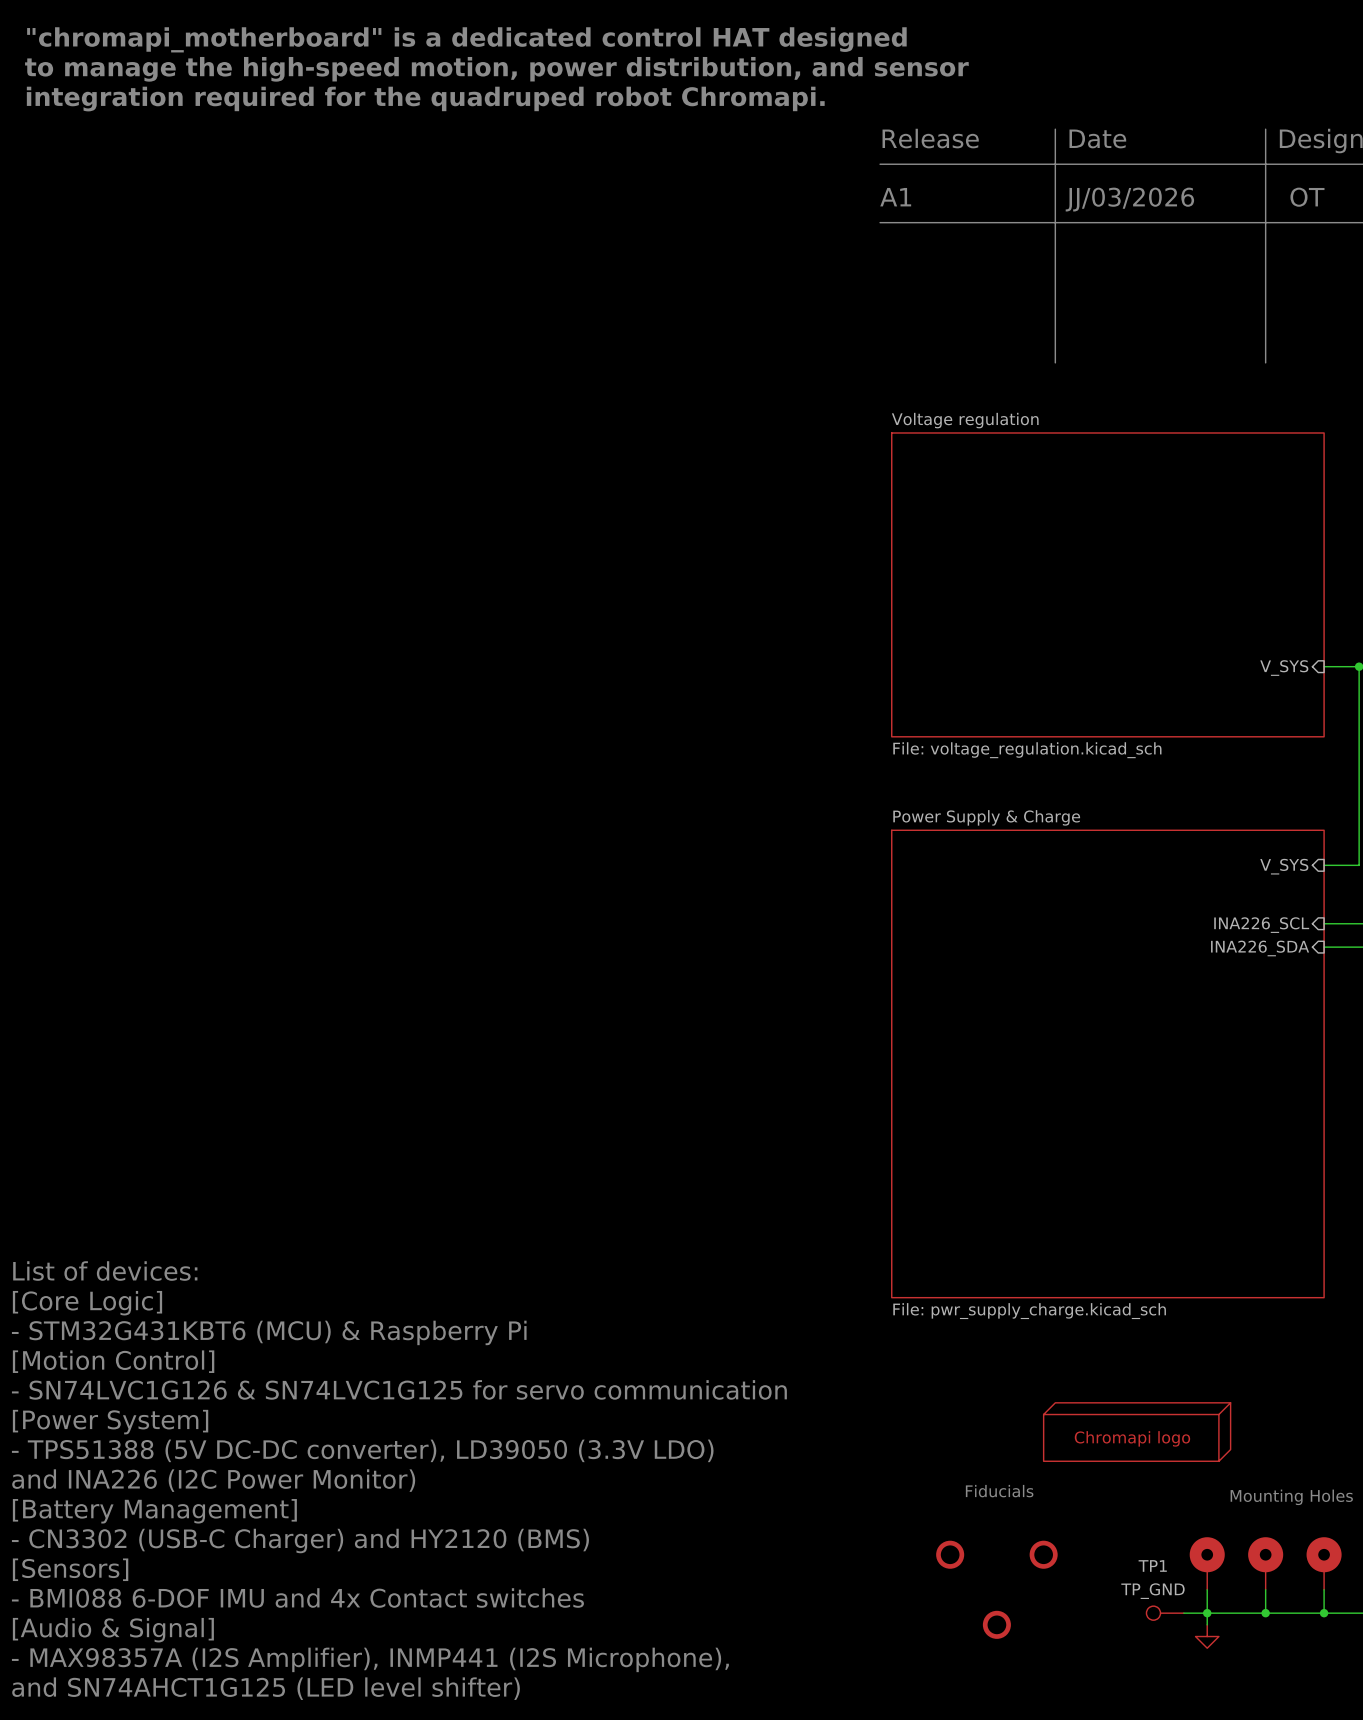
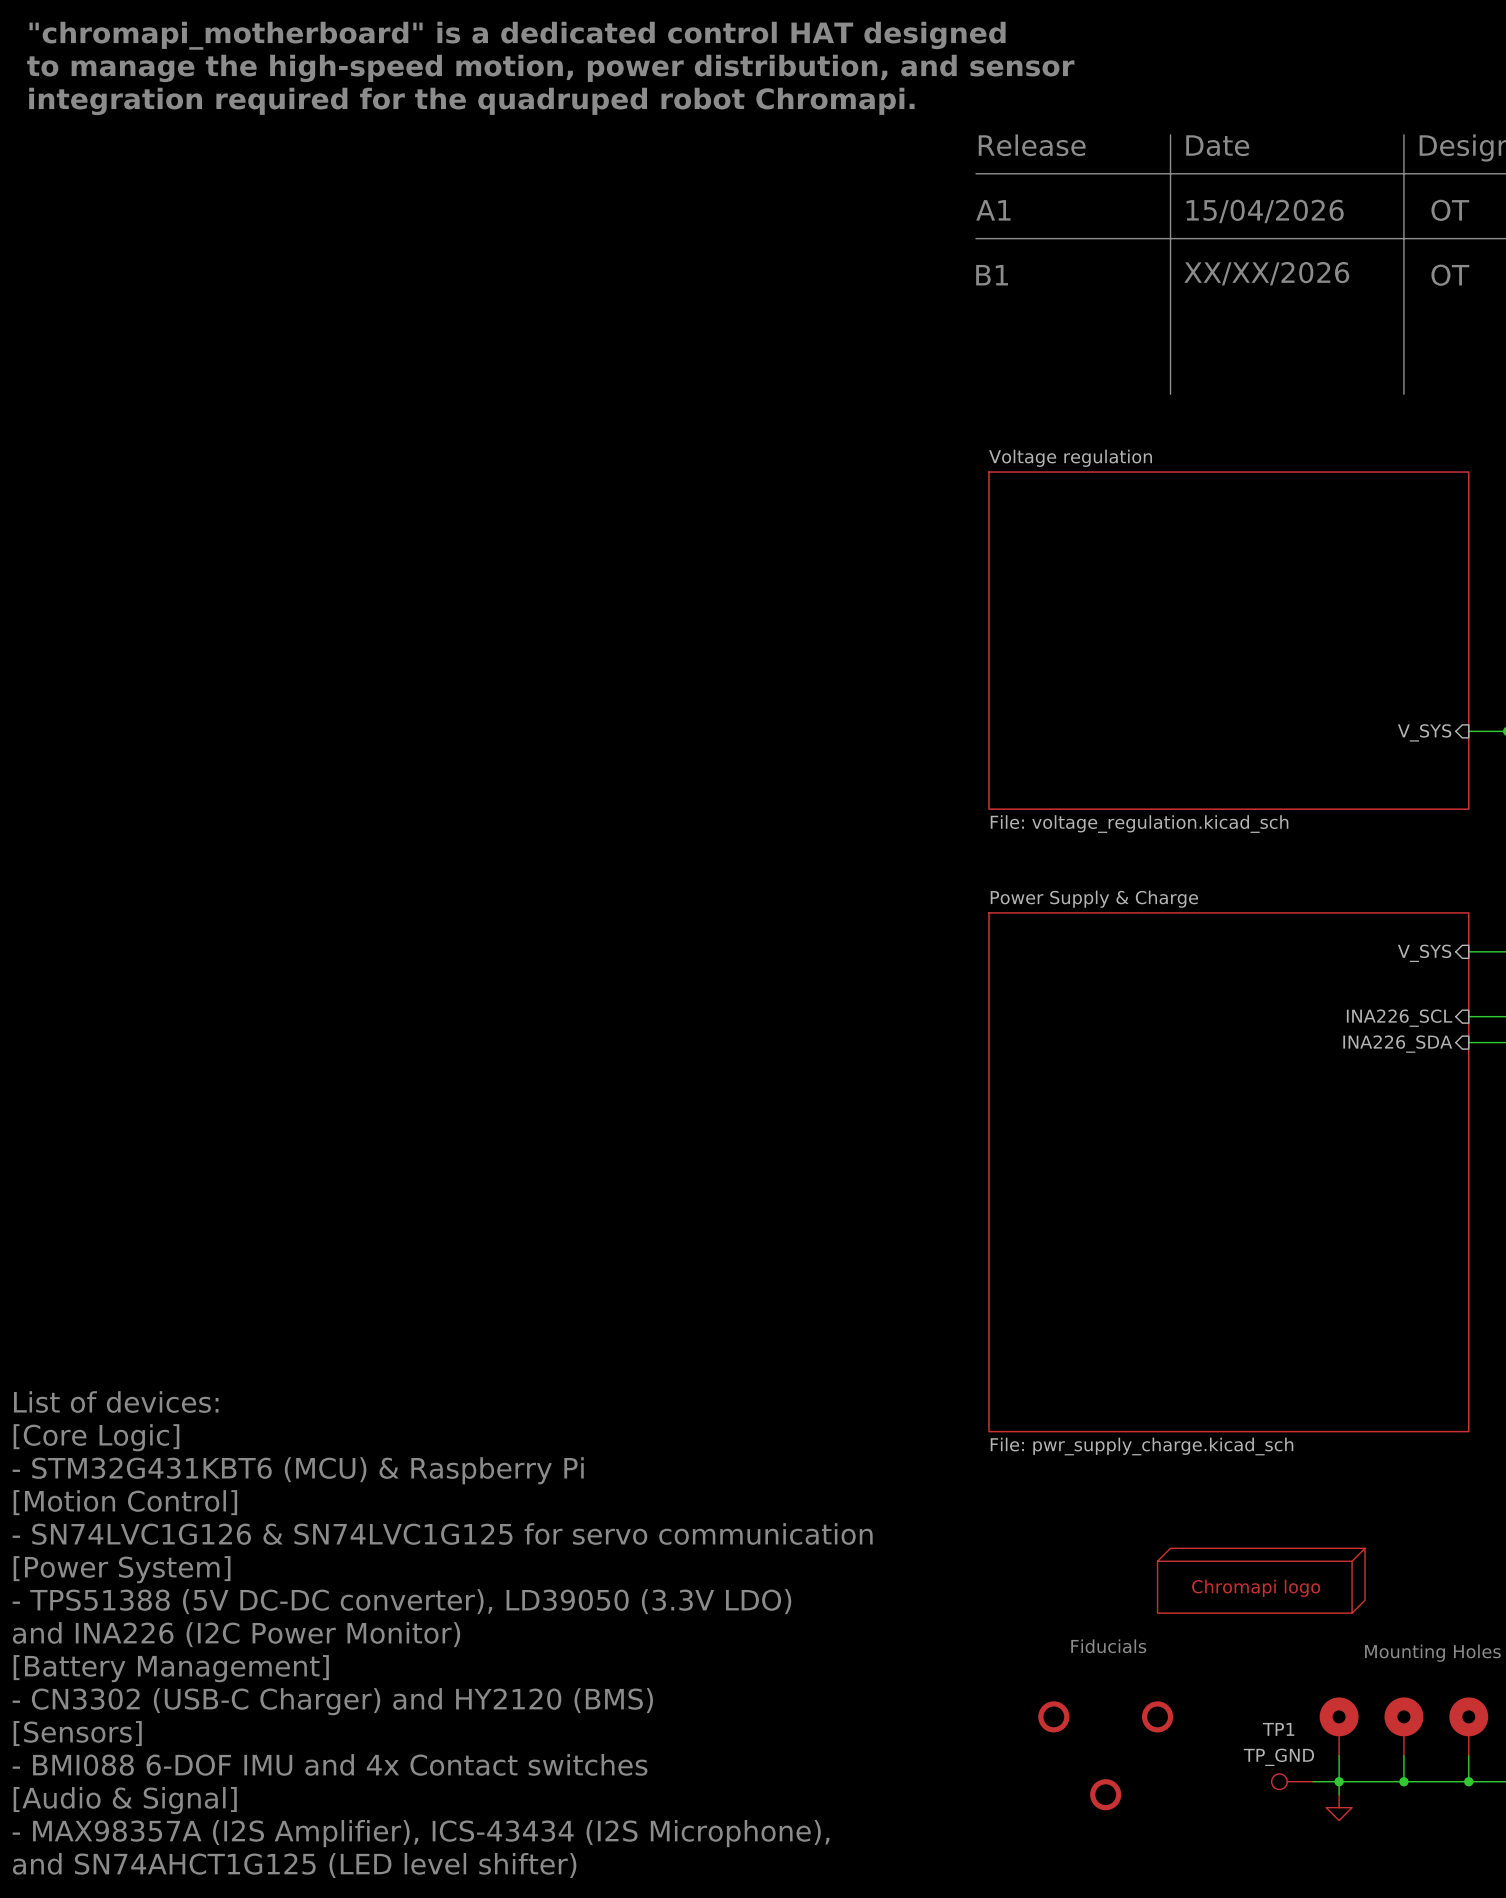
text: JJ/03/2026 (1129, 199) -> 15/04/2026 (1265, 211)
text: none -> XX/XX/2026 (1266, 273)
text: none -> B1 (992, 275)
text: none -> OT (1450, 275)
text: - MAX98357A (I2S Amplifier), INMP441 (I2S Microphone), (370, 1659) -> - MAX98357A (I2S Amplifier), ICS-43434 (I2S Microphone), (421, 1833)

